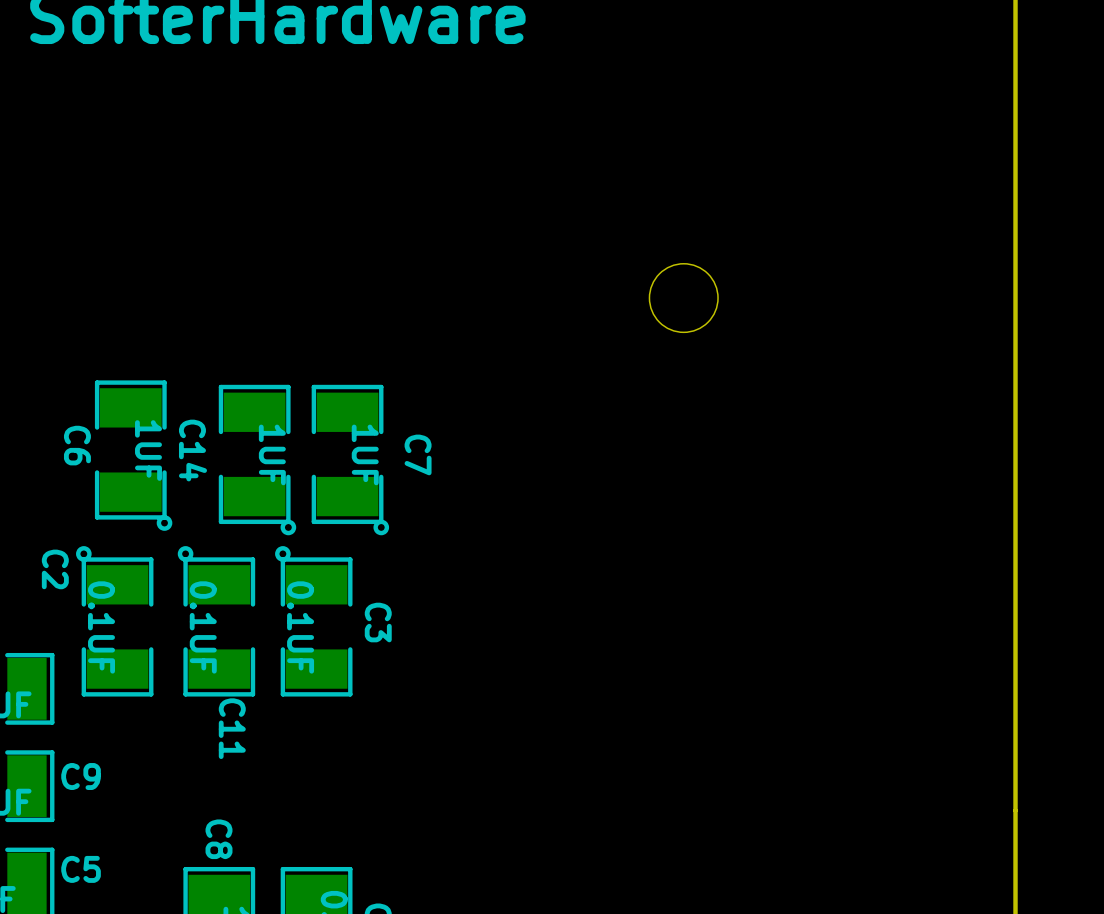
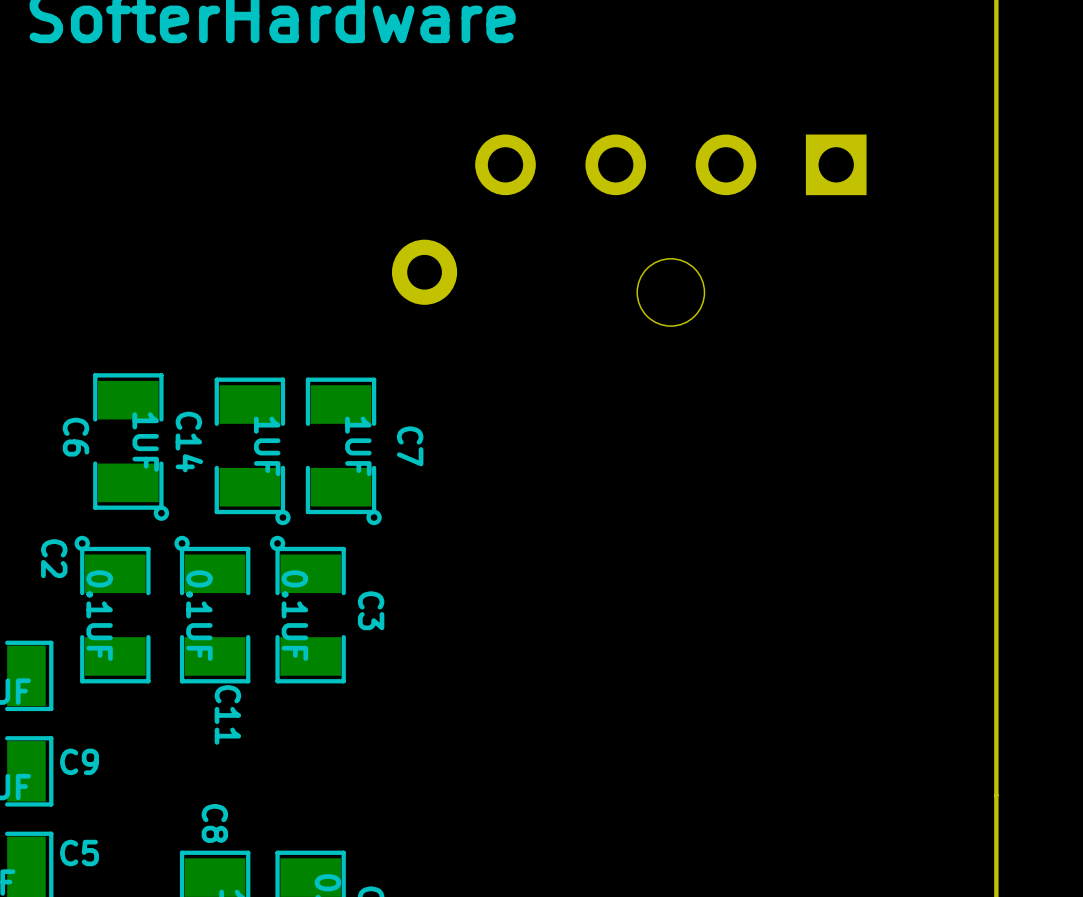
part: none -> (670, 164)
part: none -> (424, 272)

